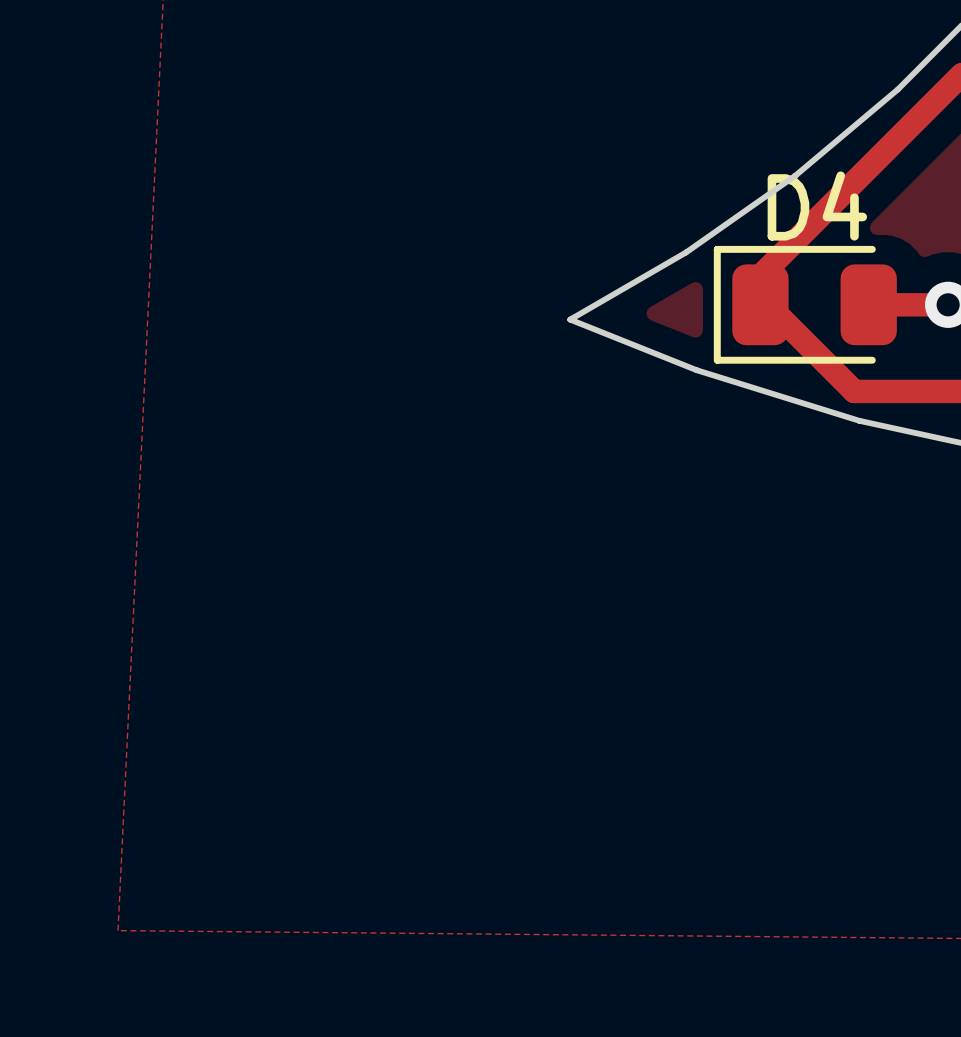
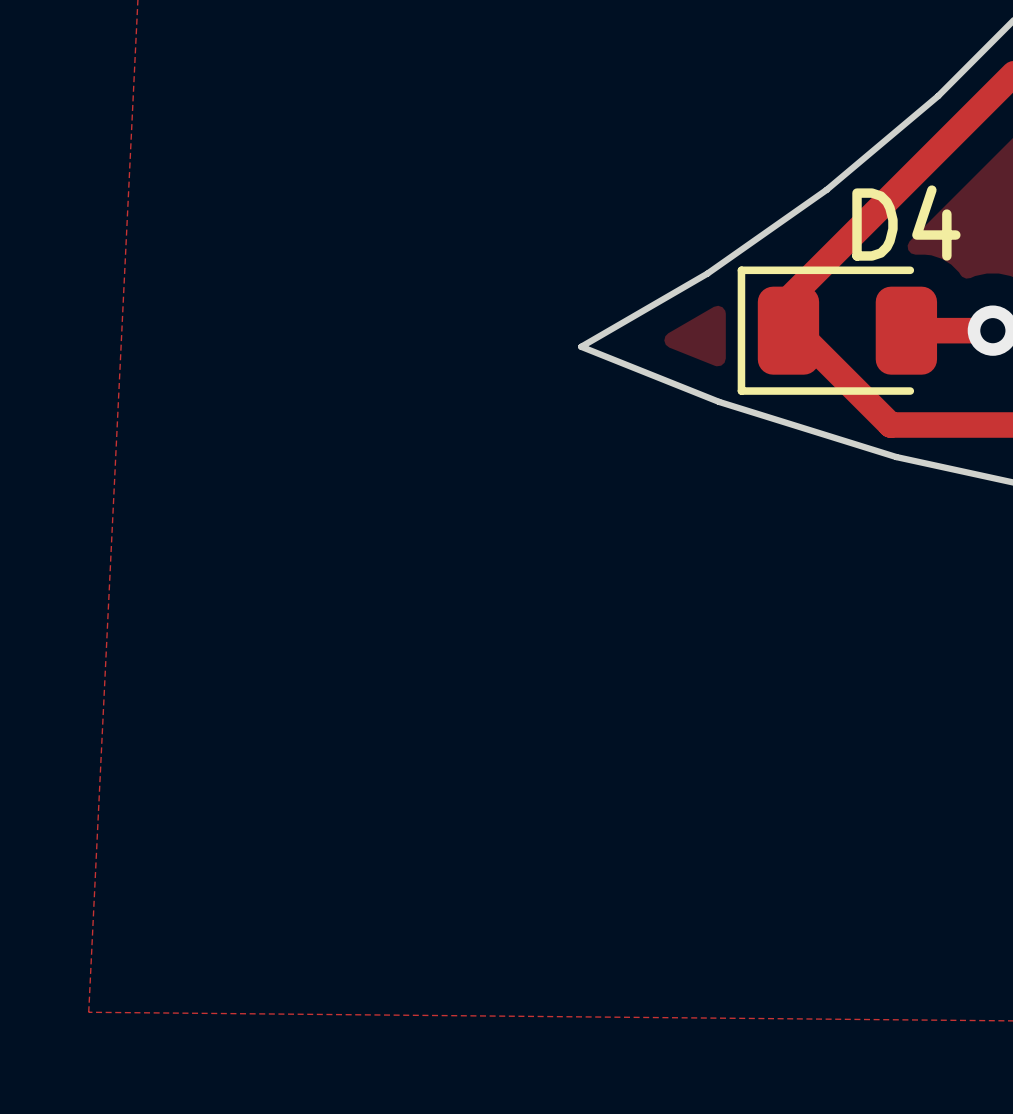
D4 name position: D4 (817, 206) -> D4 (906, 223)

